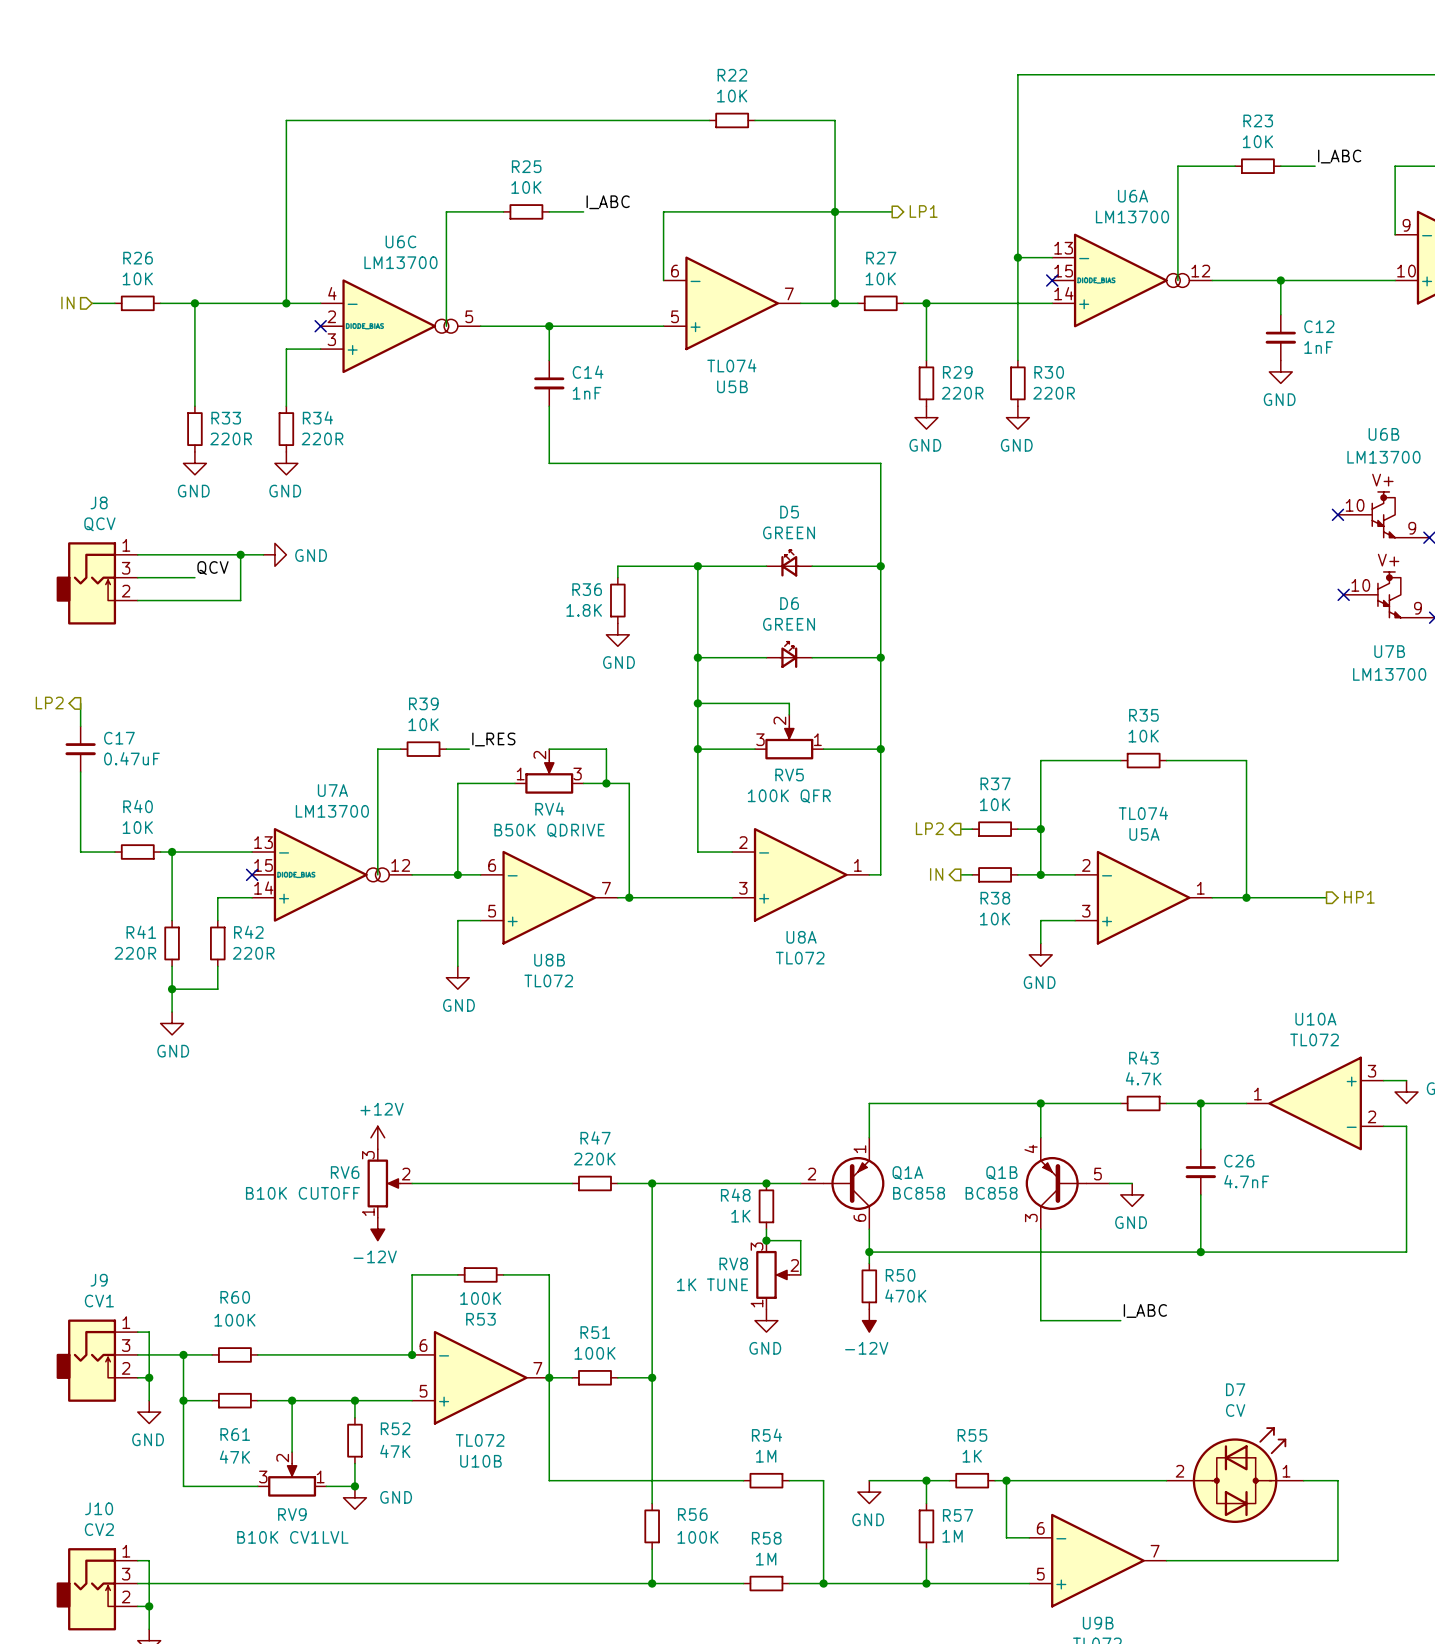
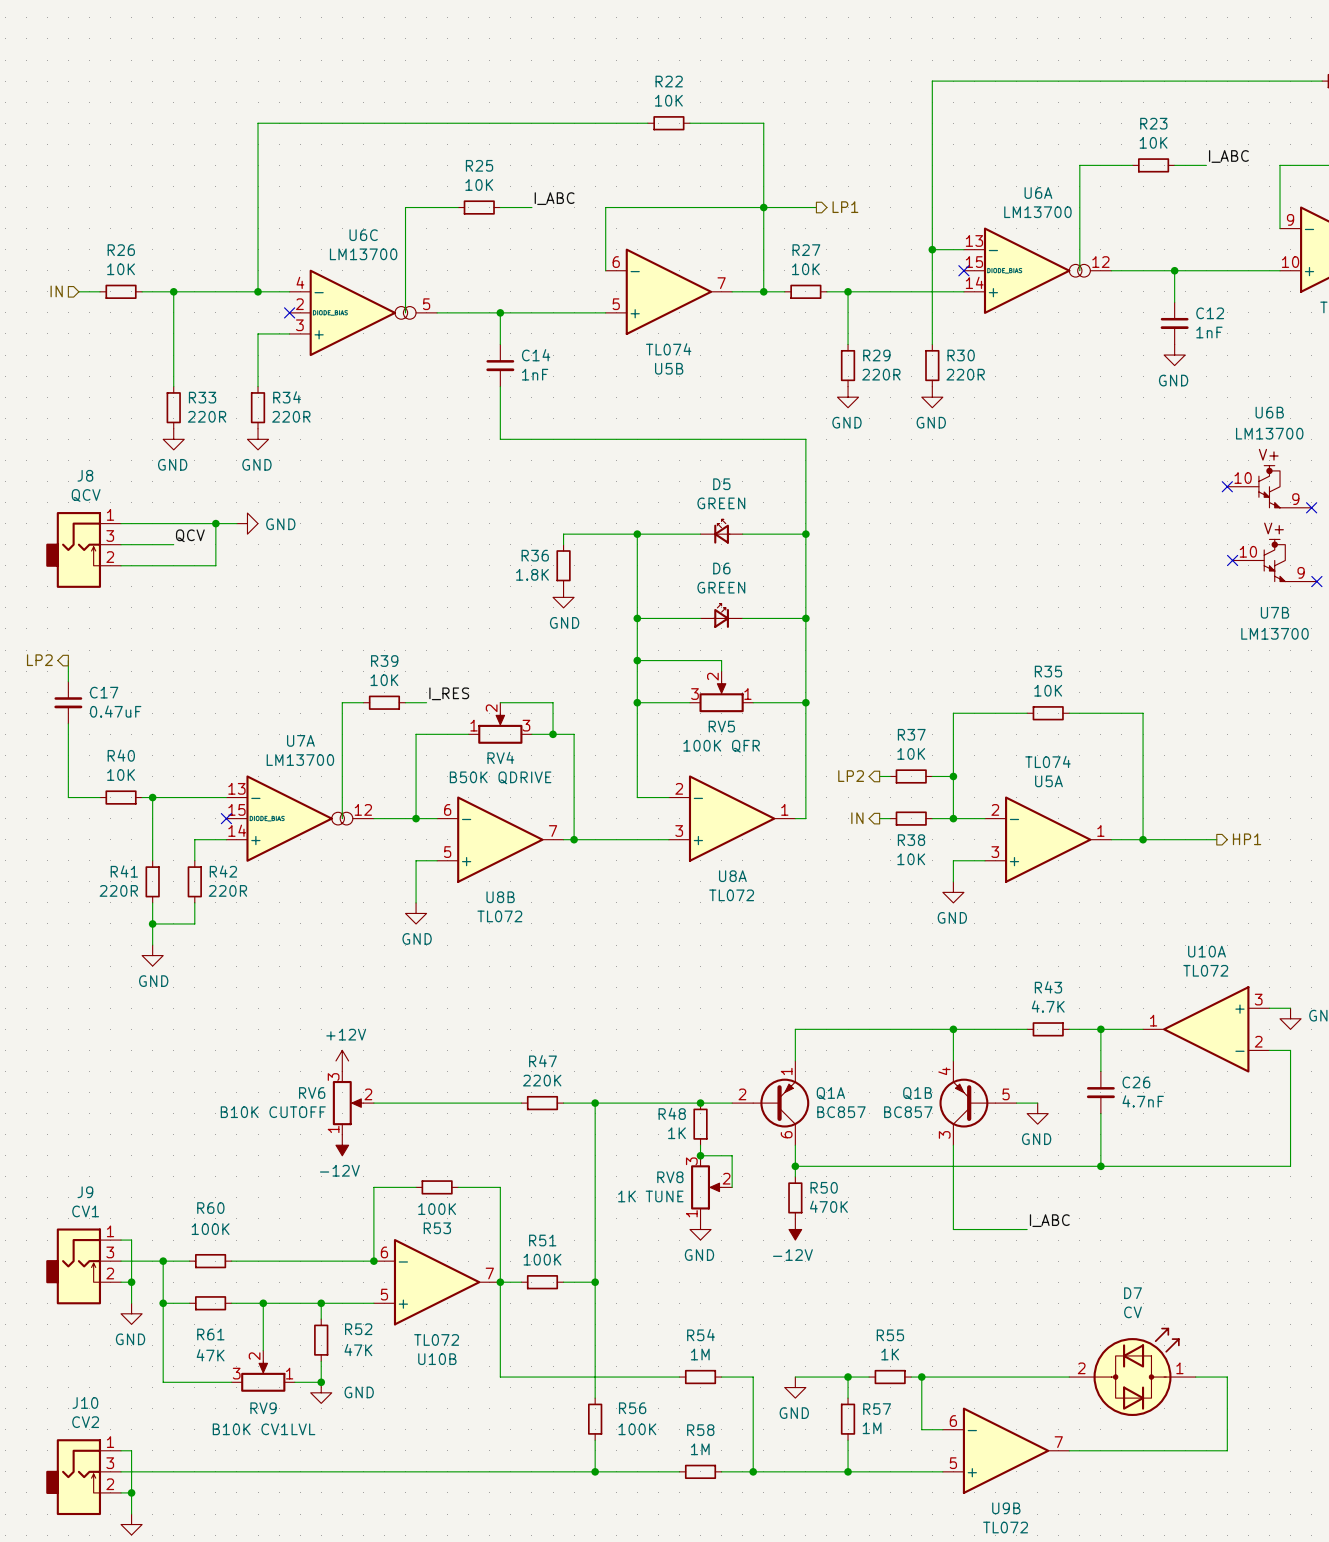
Q1A value: BC858 (919, 1193) -> BC857 (841, 1112)
Q1B value: BC858 (991, 1193) -> BC857 (908, 1112)

